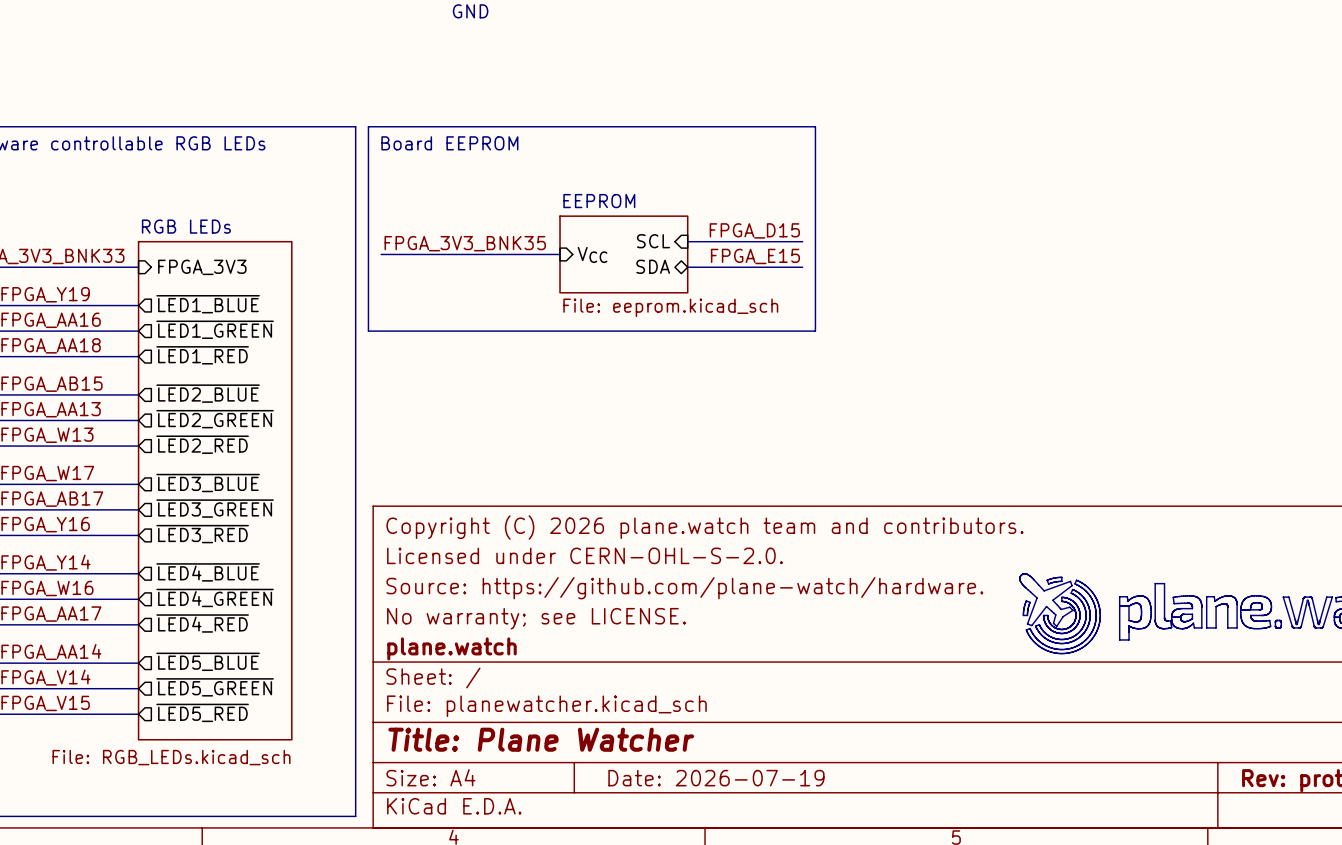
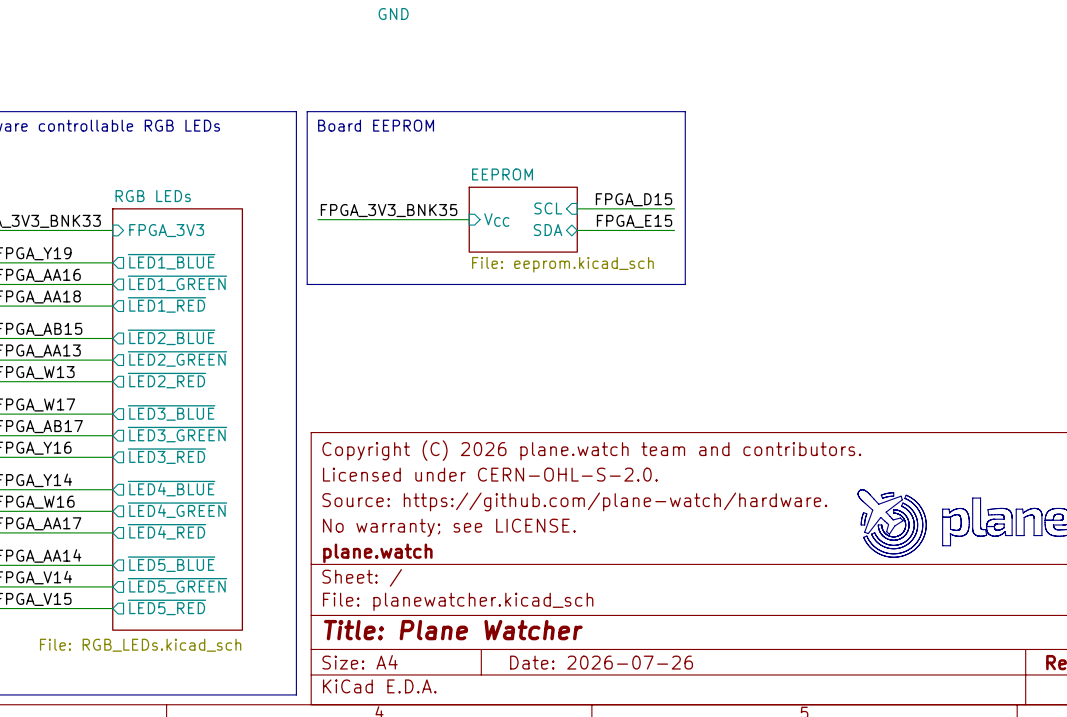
title block: Date: 2026-07-19 (716, 778) -> Date: 2026-07-26 (601, 662)

